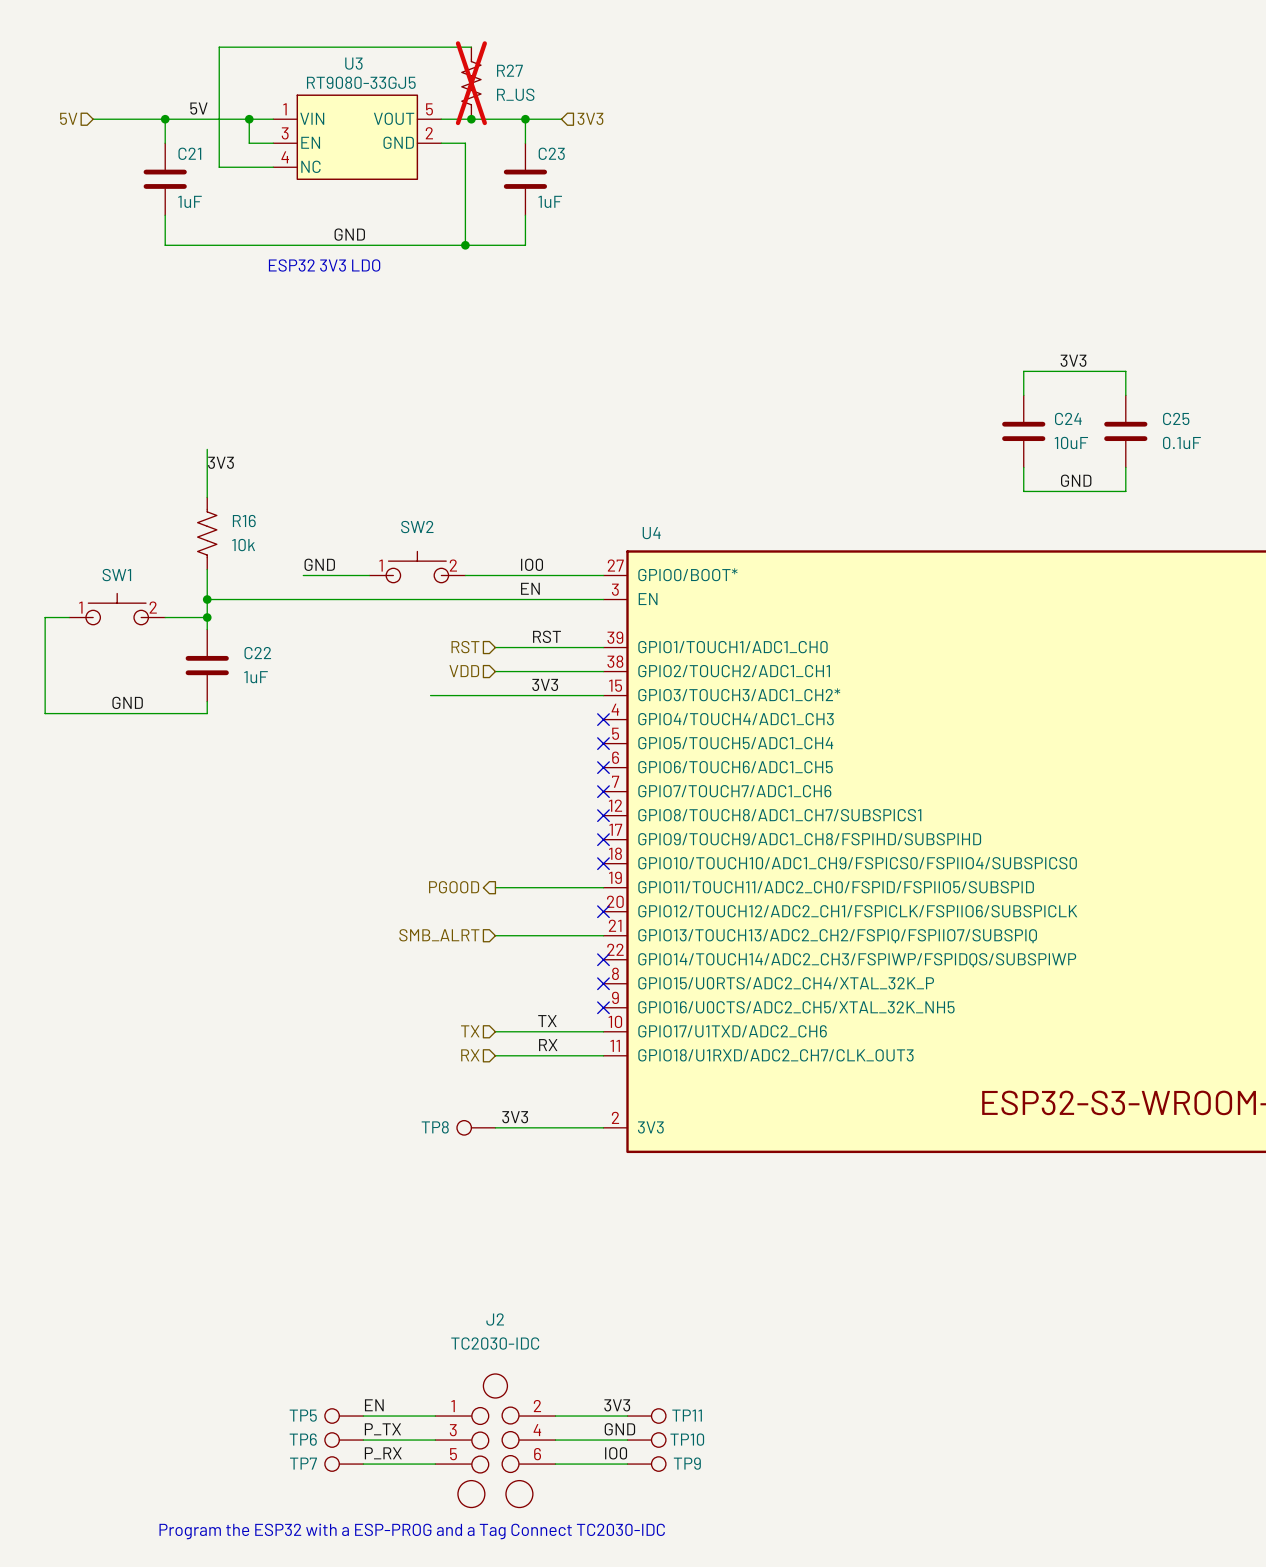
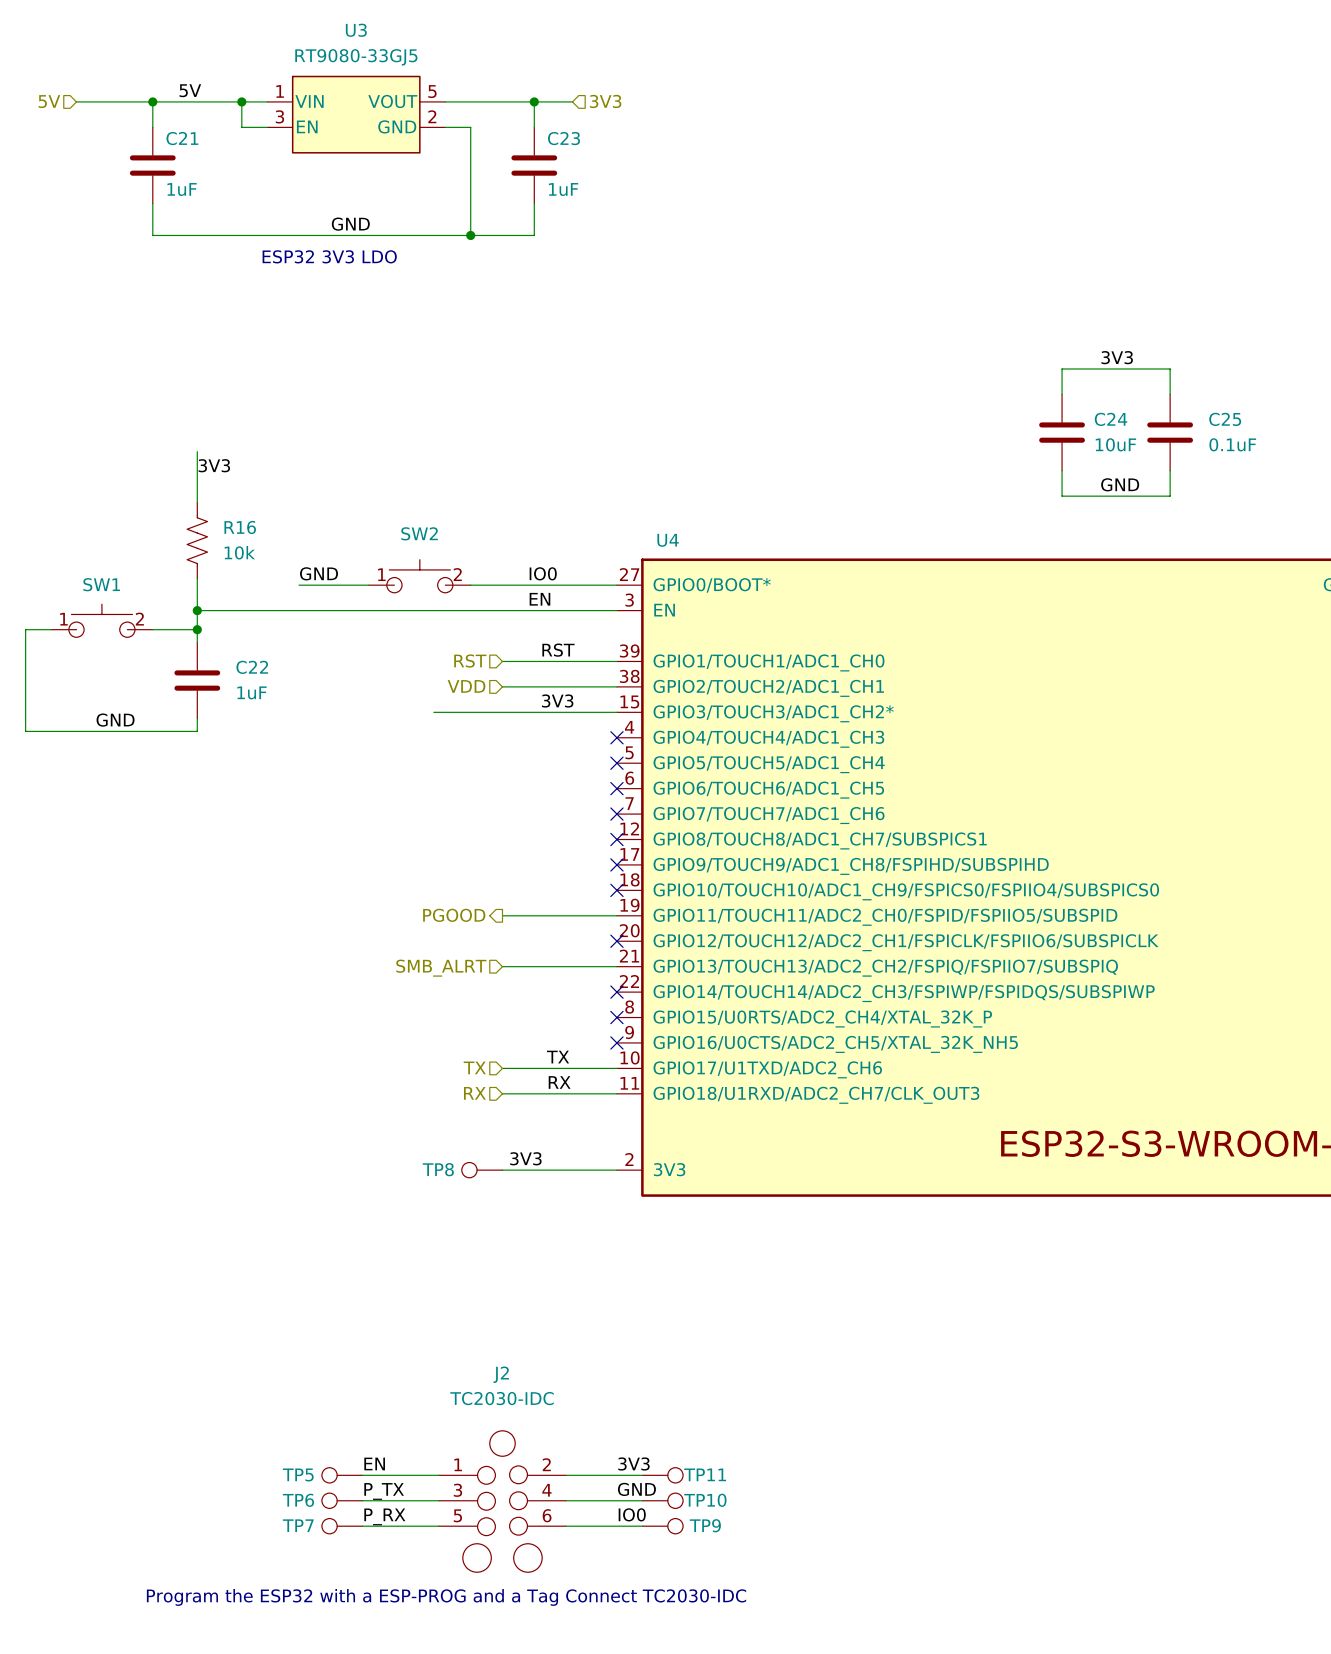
wire: (471, 47) (219, 47) (219, 167) (273, 167) -> none
R27: R_US (471, 83) -> none
U3 symbol: [273, 94, 442, 180] -> [267, 75, 446, 154]
junction: (471, 119) -> none

